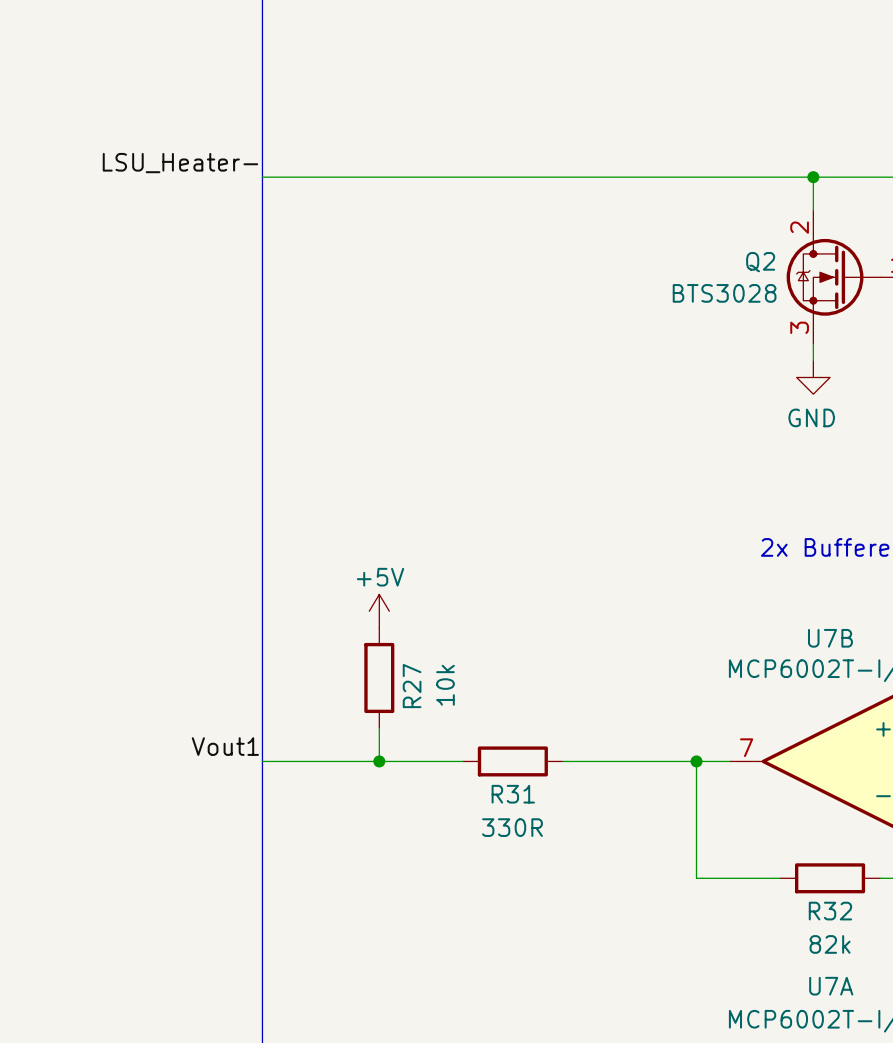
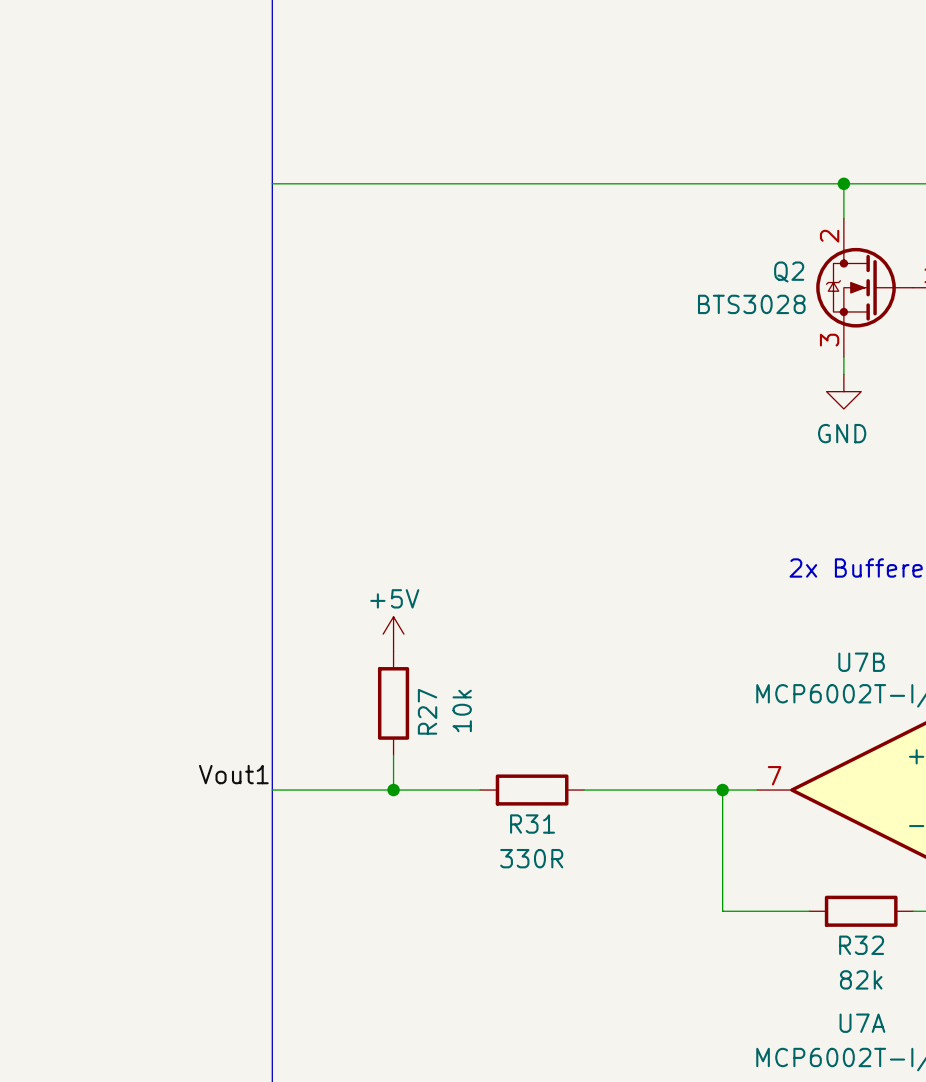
label: LSU_Heater- (180, 163) -> none

